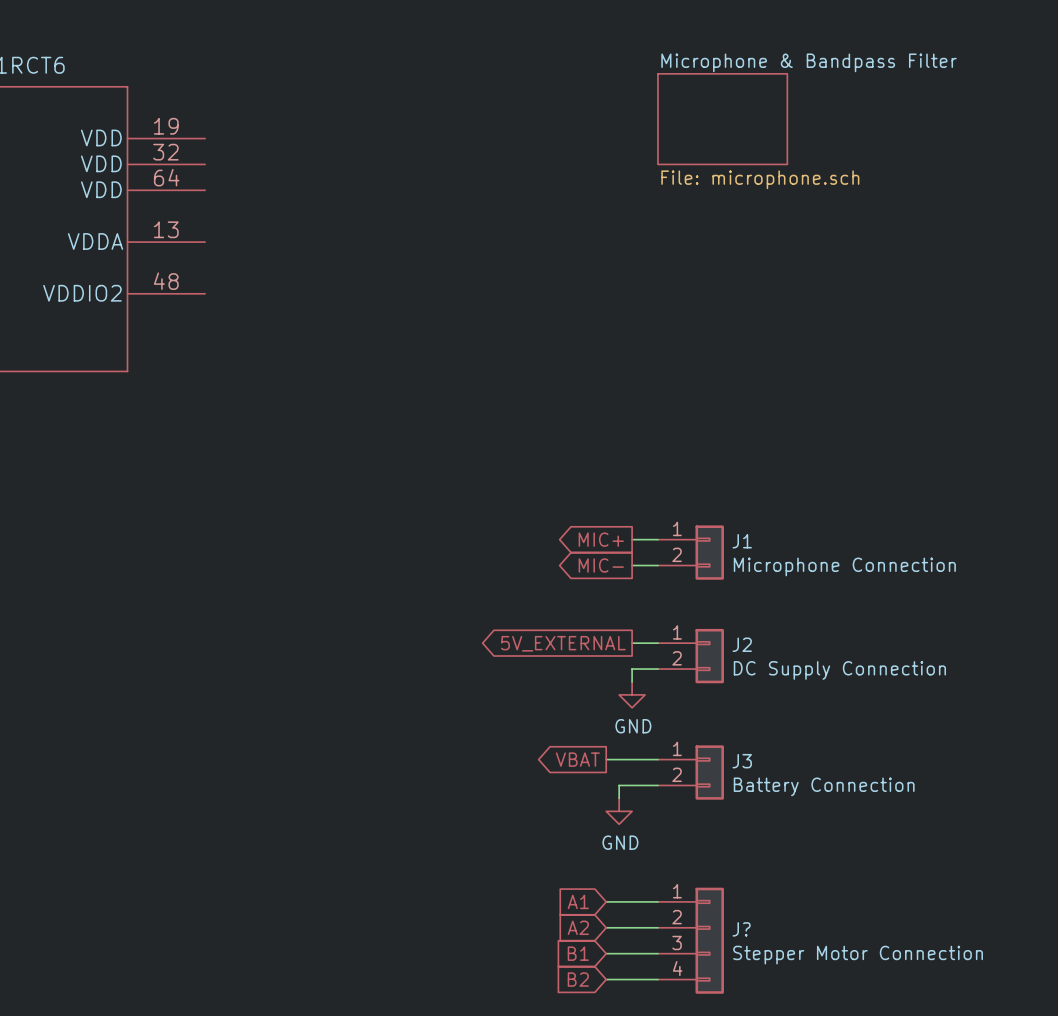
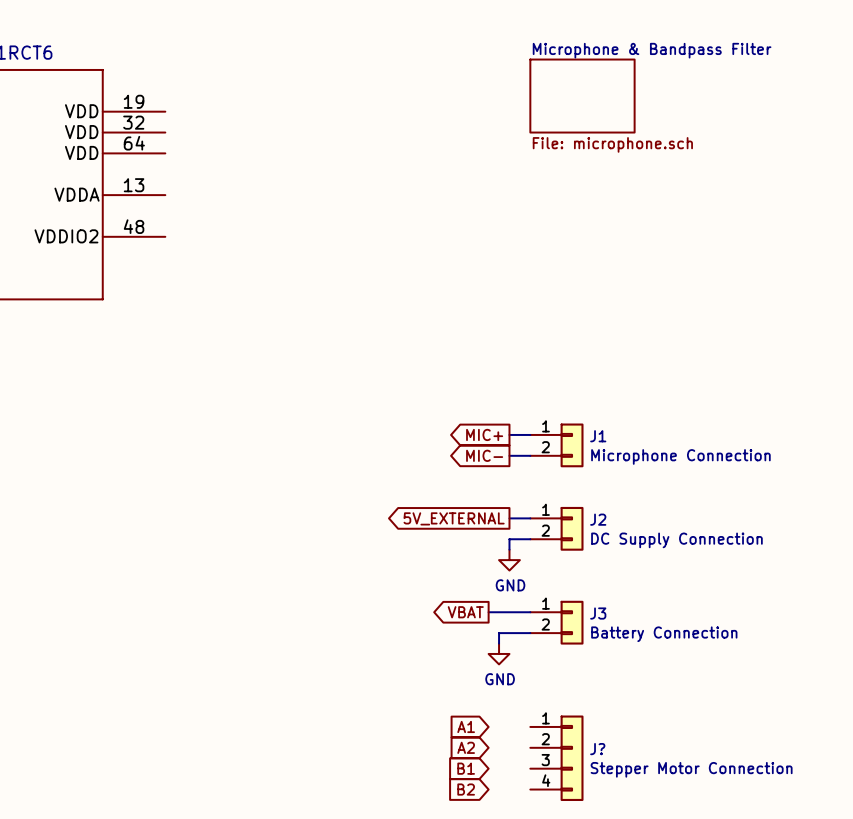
wire: (606, 901) (657, 901) -> none
wire: (606, 927) (657, 927) -> none
wire: (606, 953) (657, 953) -> none
wire: (606, 979) (657, 979) -> none

